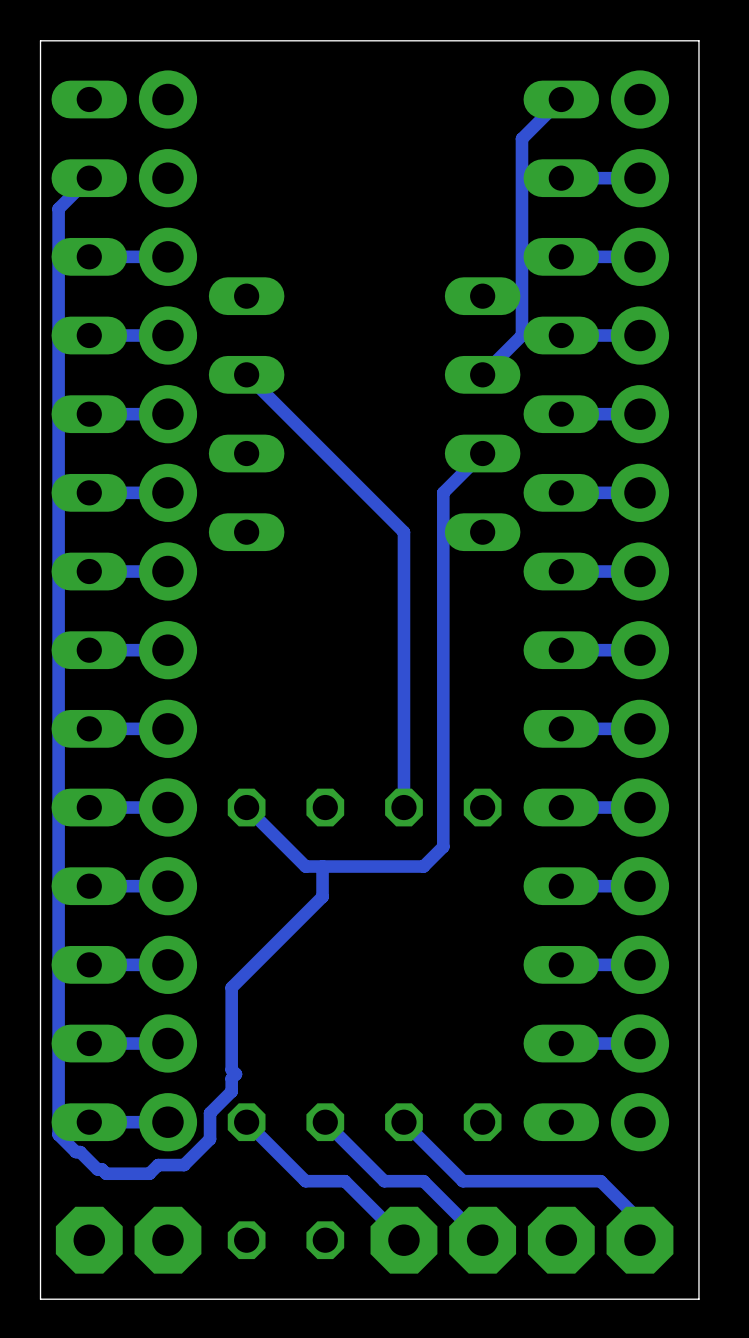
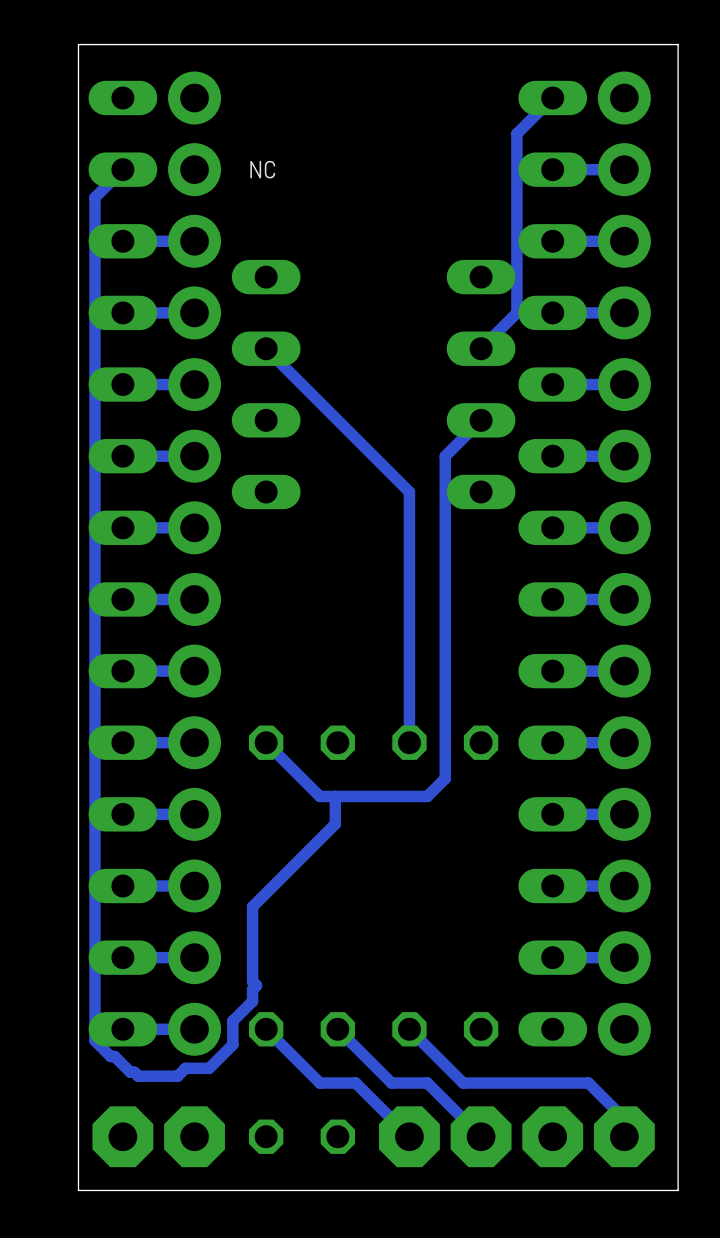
text: none -> NC (262, 169)

